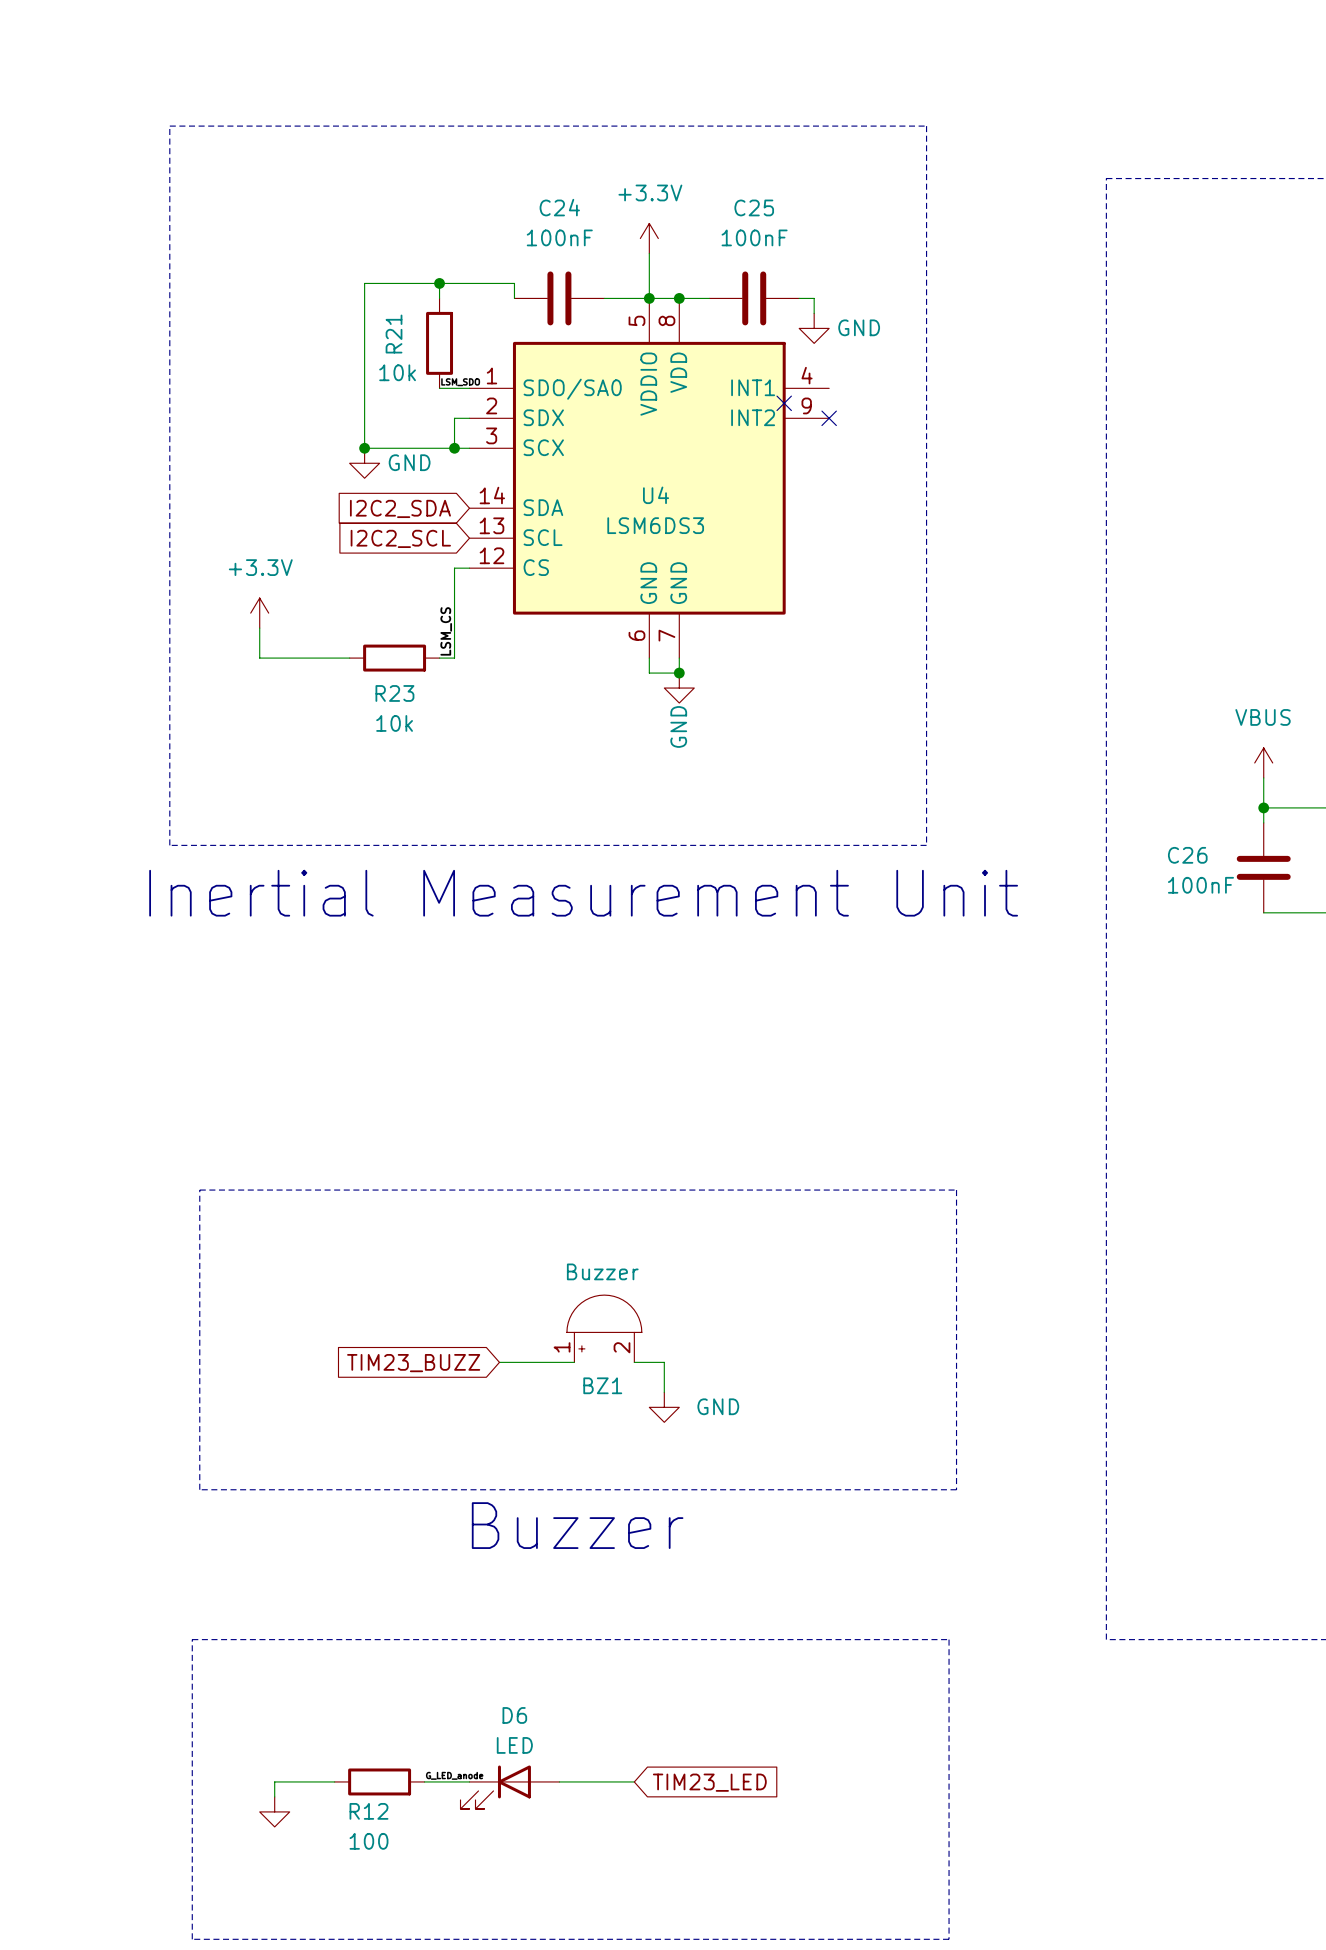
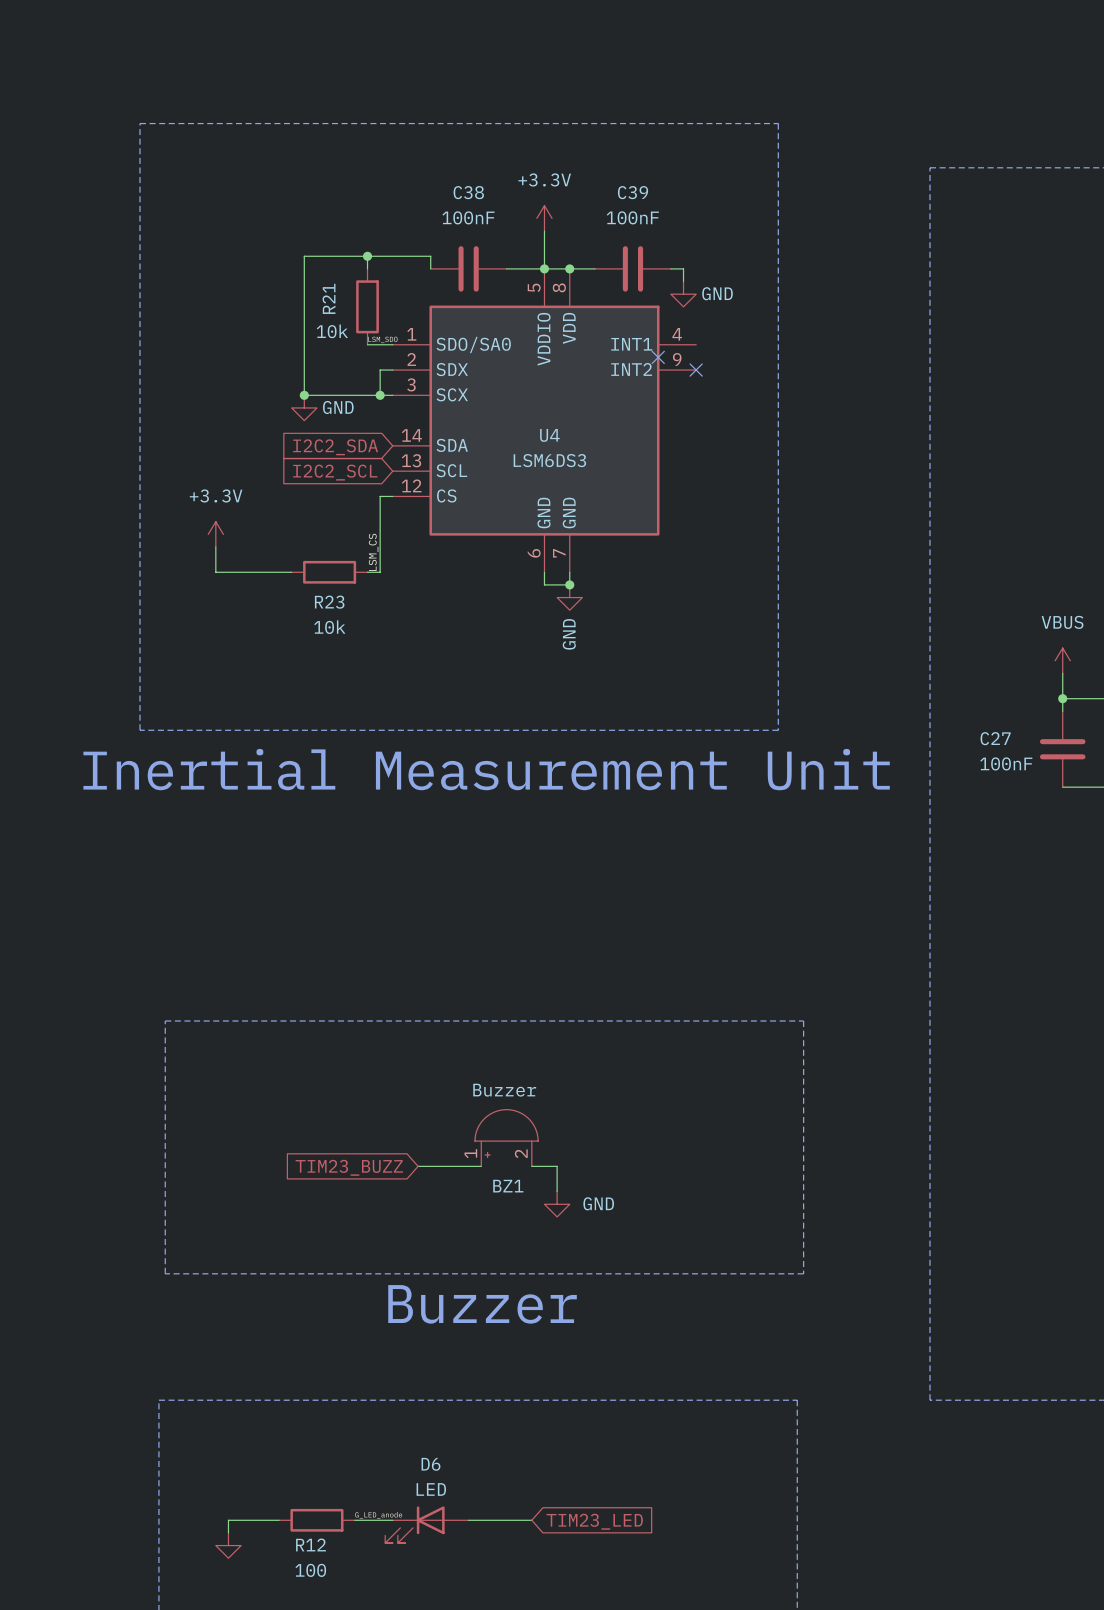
C24 name: C24 (559, 207) -> C38 (468, 192)
C25 name: C25 (754, 207) -> C39 (633, 192)
C26 name: C26 (1187, 855) -> C27 (995, 738)

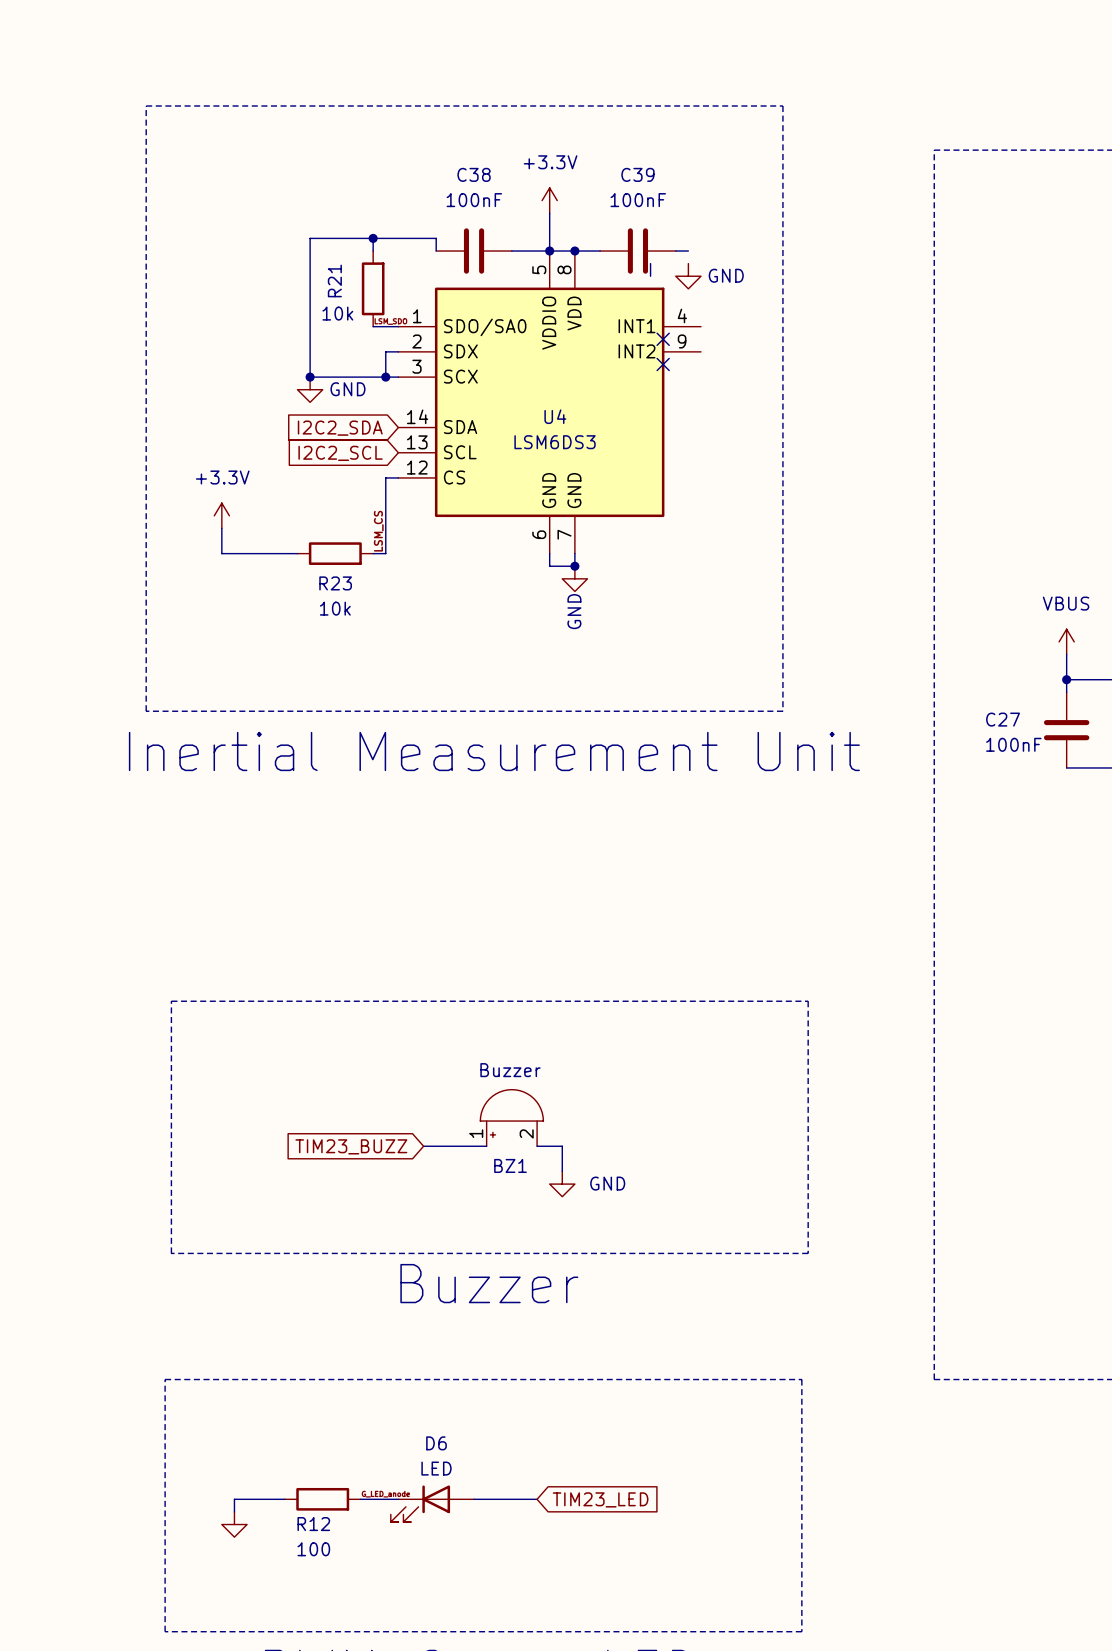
wire: (683, 268) (683, 281) -> (650, 263) (650, 276)
no-connect mark position: (696, 370) -> (663, 364)

